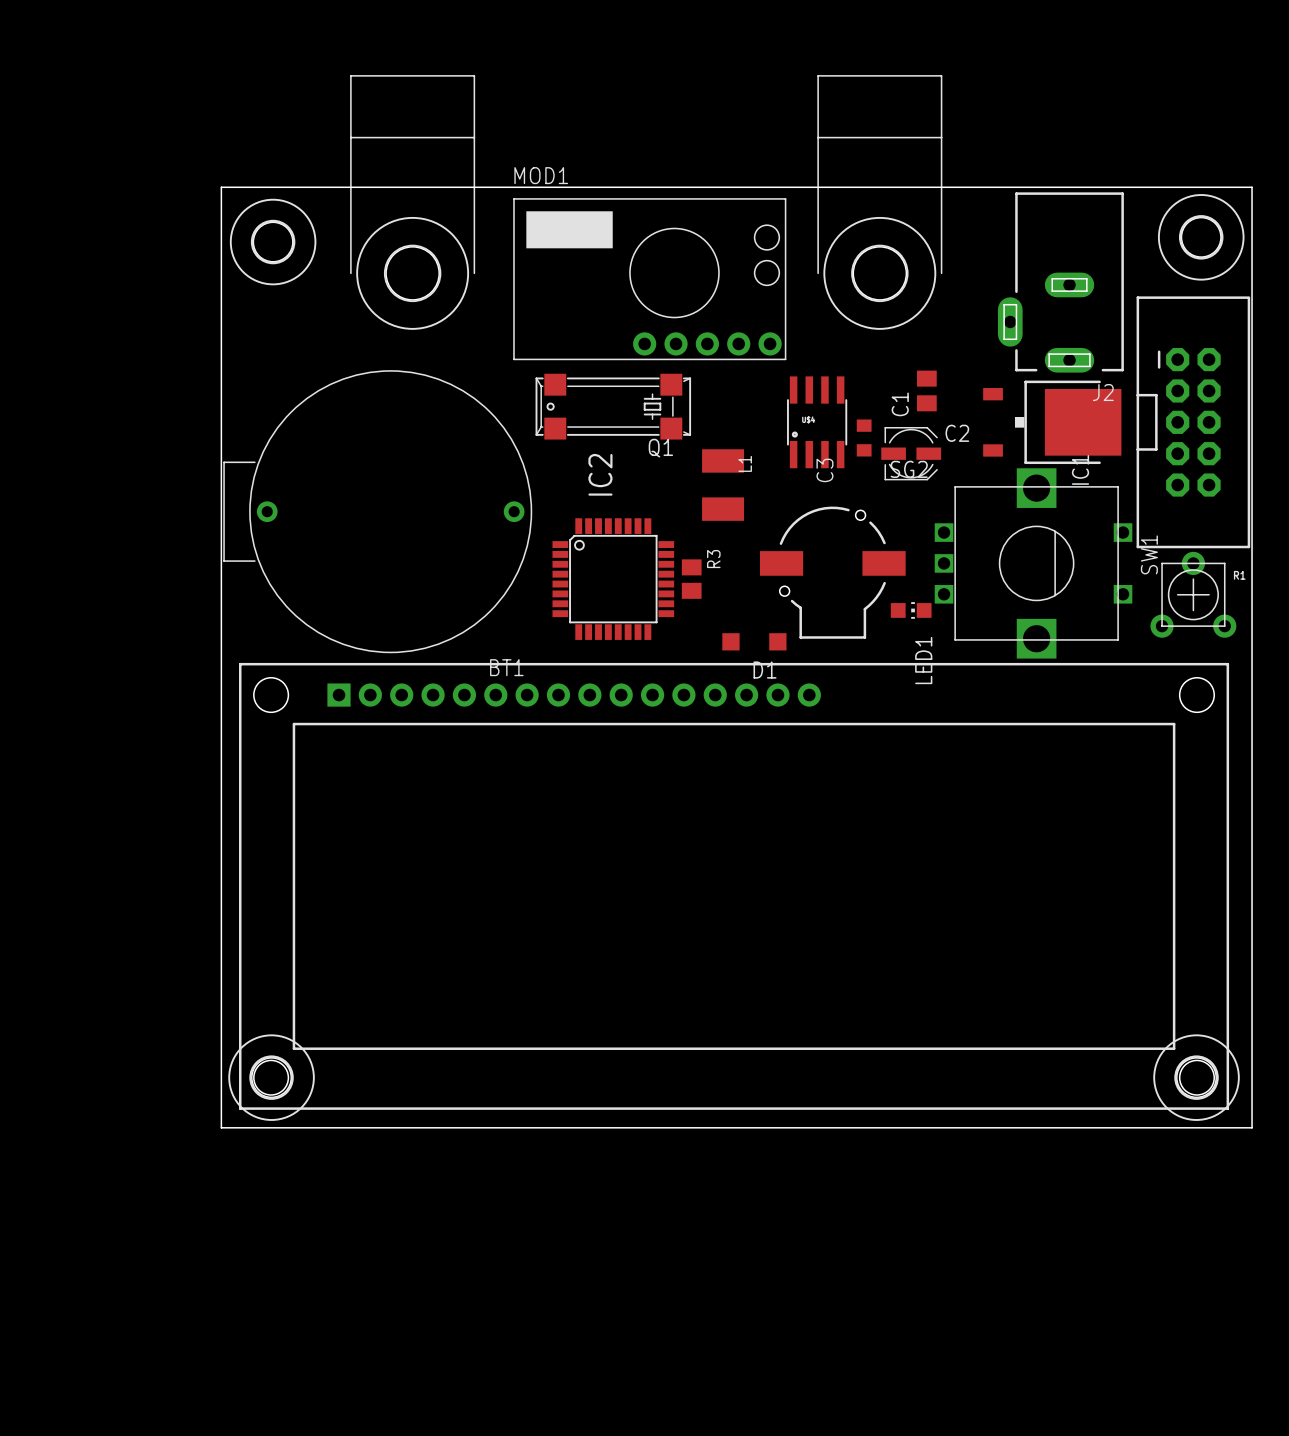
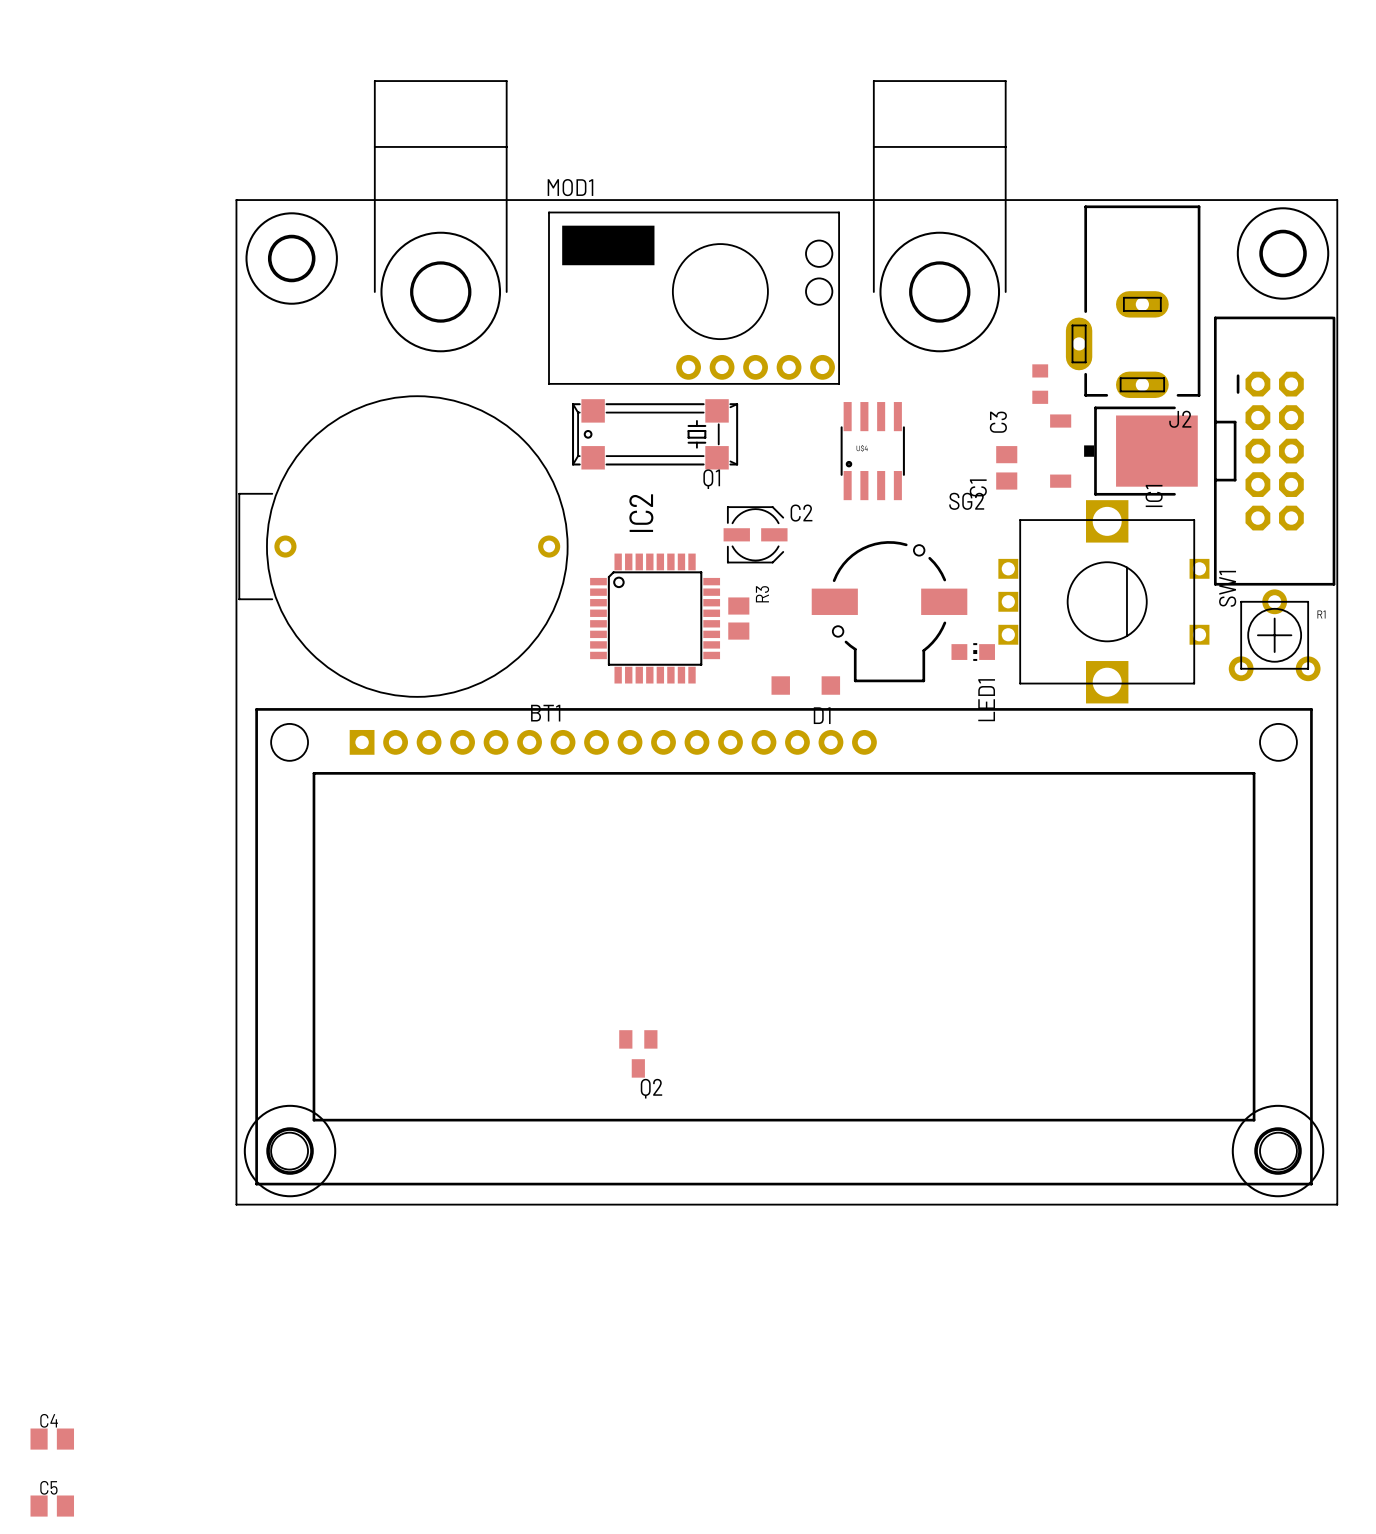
C1 position: (926, 390) -> (1006, 467)
C3 position: (864, 438) -> (1040, 384)
C2 position: (911, 453) -> (755, 534)
L1: (723, 485) -> none
Q2: none -> (638, 1053)
C4: none -> (52, 1439)
C5: none -> (52, 1506)

